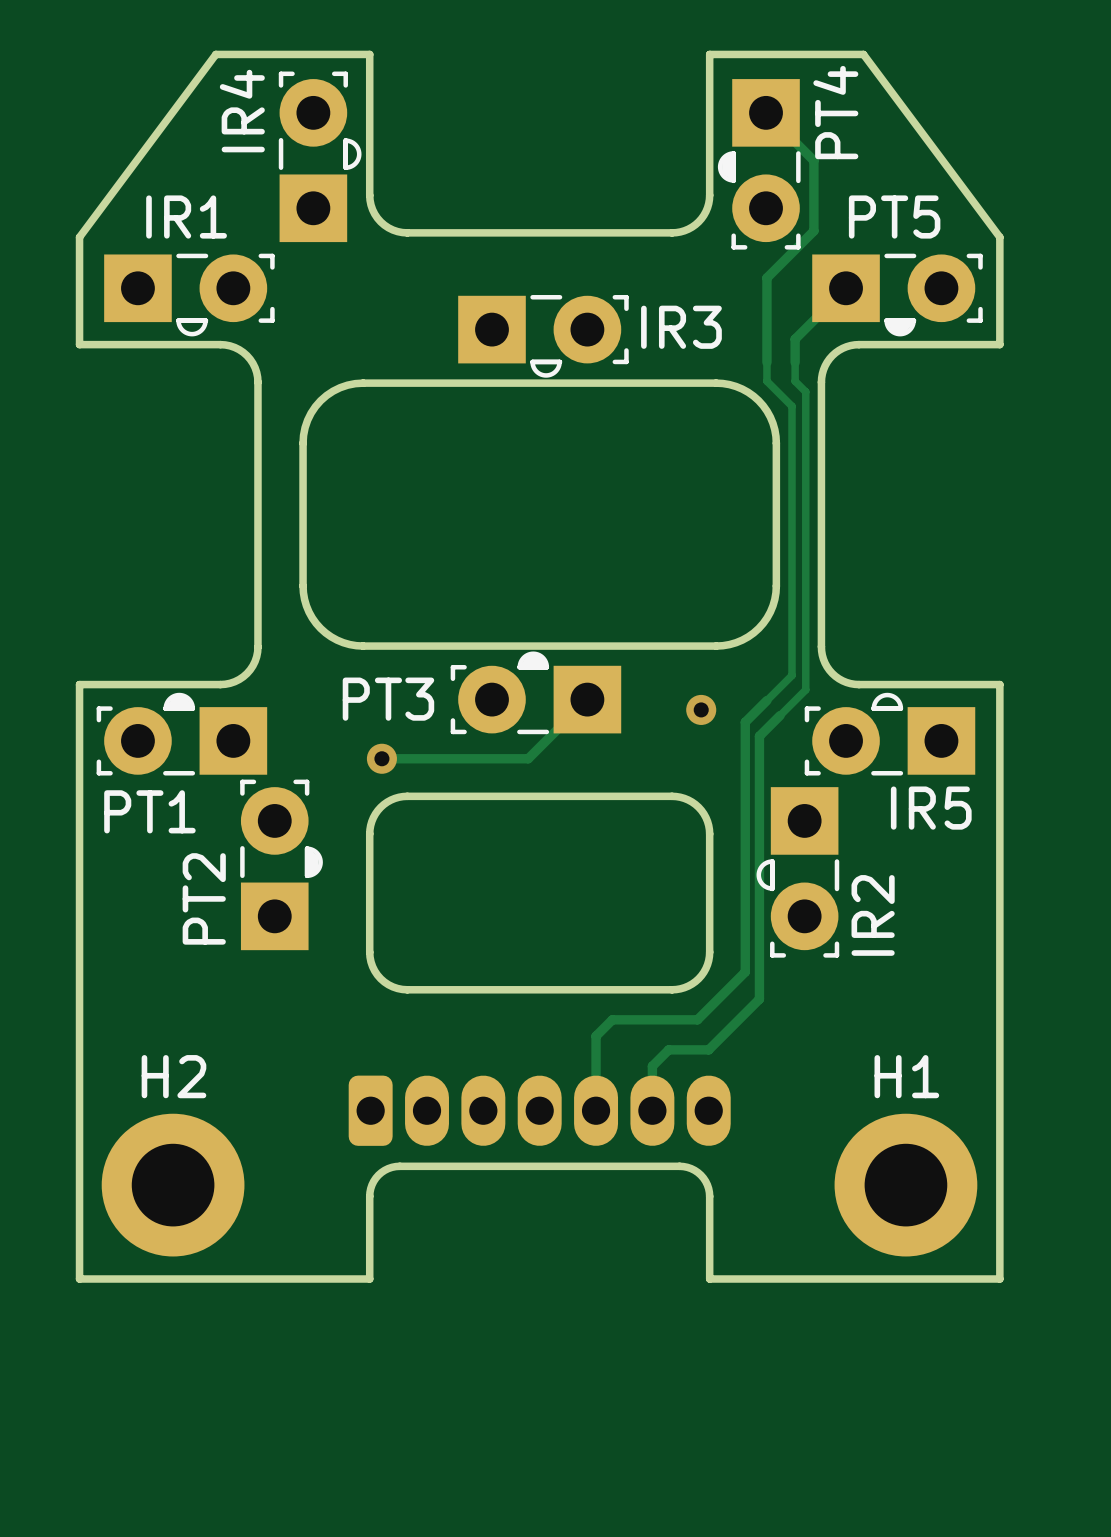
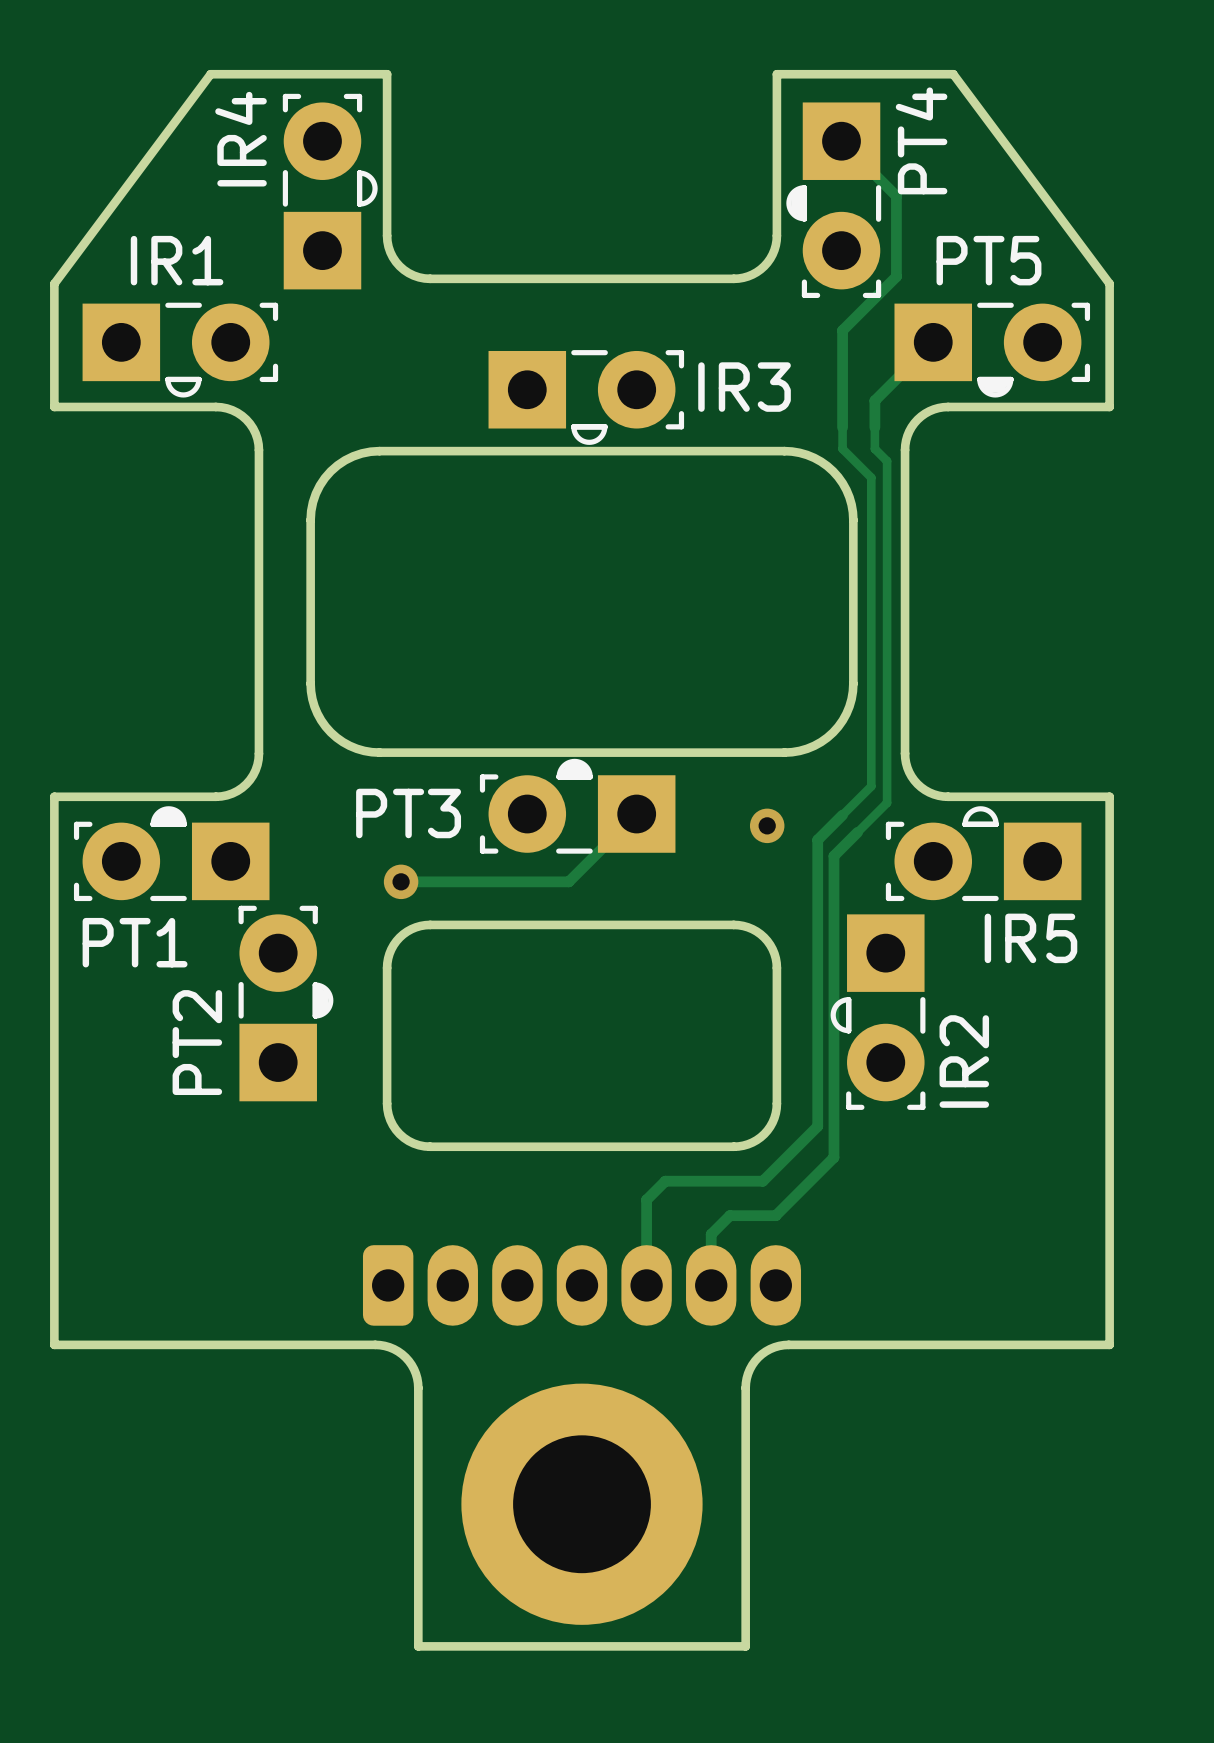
board edge: (79, 1162) (79, 1279) (369, 1279) (370, 1188) (373, 1181) (381, 1172) (388, 1168) (399, 1166) (679, 1166) (691, 1168) (703, 1178) (709, 1192) (709, 1279) (999, 1279) (999, 1162) -> (54, 1344) (375, 1344) (389, 1347) (402, 1354) (414, 1369) (418, 1387) (418, 1646) (745, 1646) (745, 1383) (748, 1373) (755, 1361) (770, 1349) (788, 1344) (1109, 1344)
H2: (173, 1185) -> none
H1: (905, 1185) -> none
part: none -> (581, 1504)

